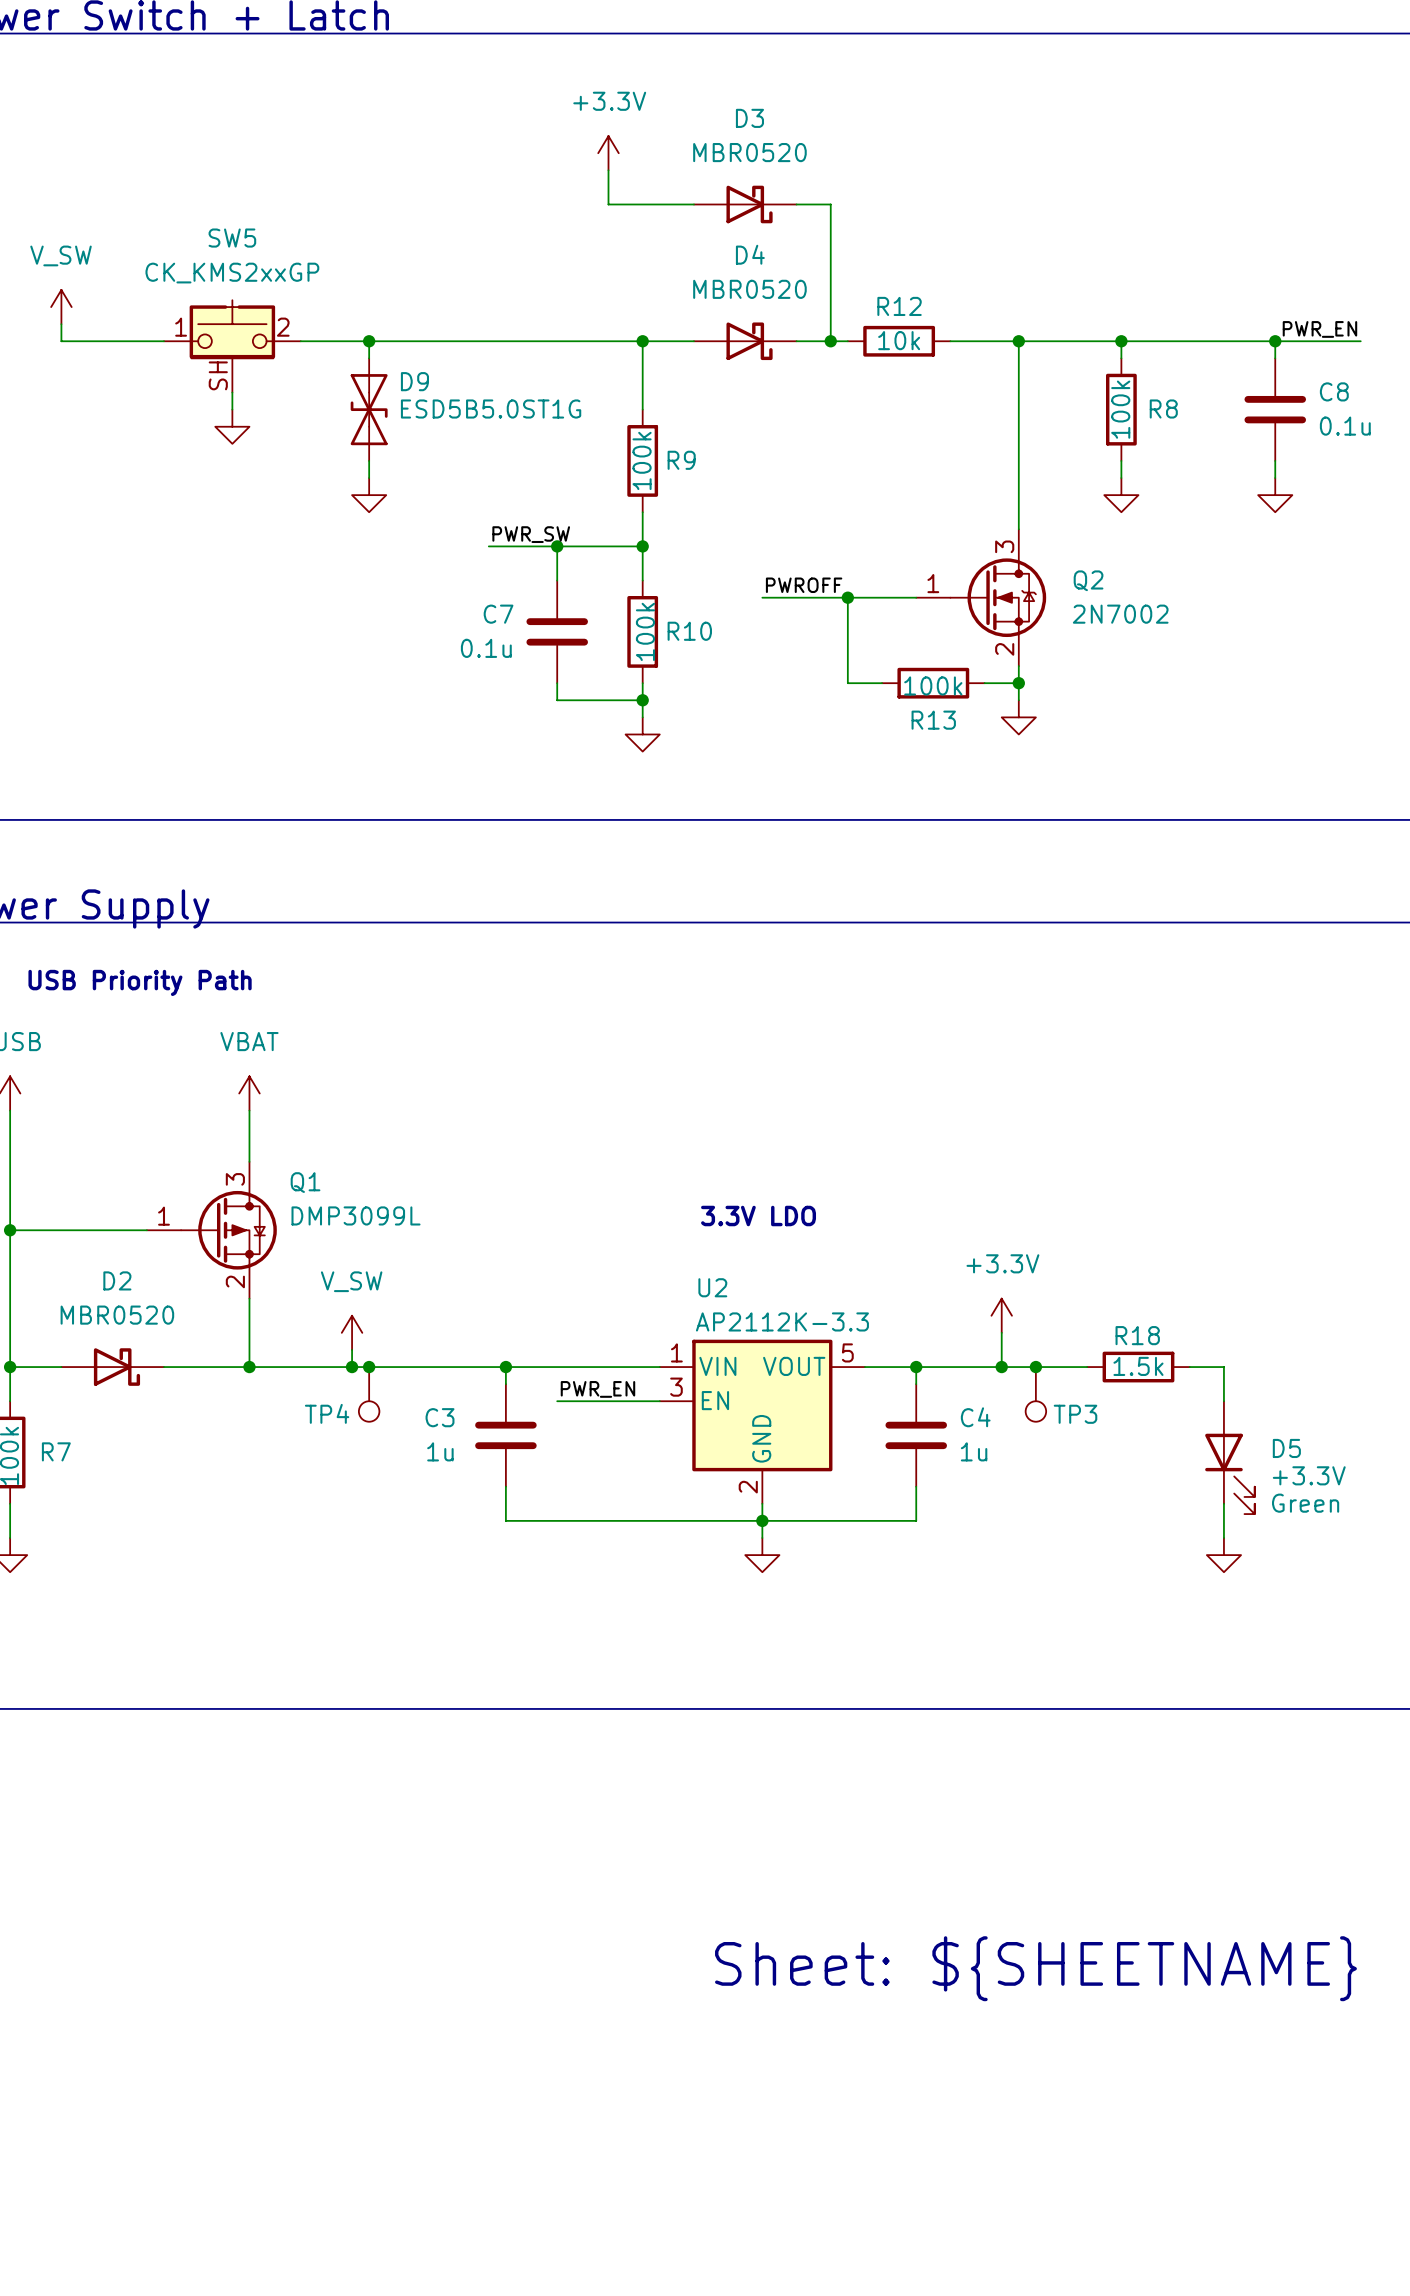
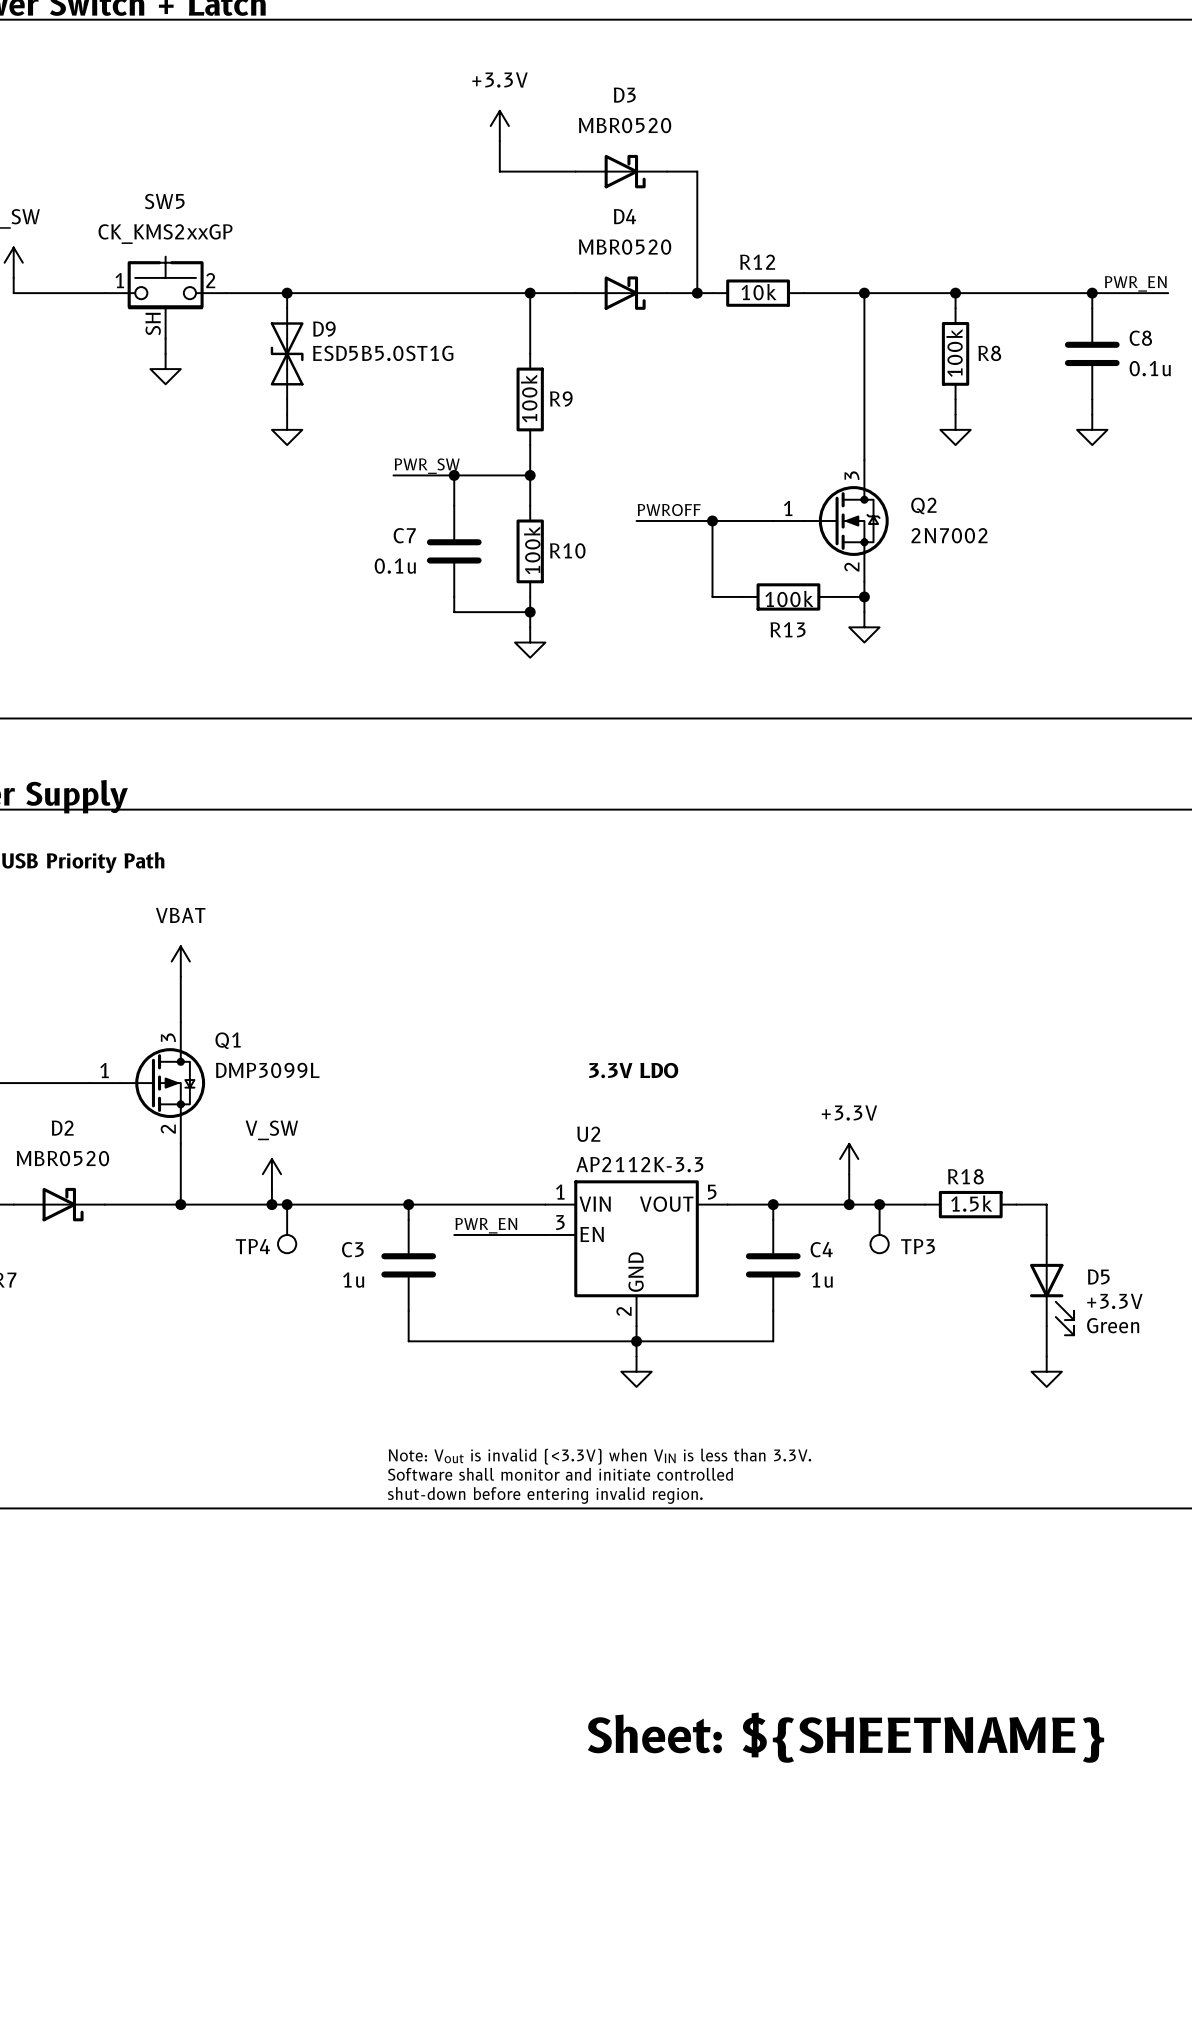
text: none -> Note: Vout is invalid (<3.3V) when VIN is less than 3.3V. (599, 1456)
text: none -> Software shall monitor and initiate controlled (560, 1474)
text: none -> shut-down before entering invalid region. (545, 1495)

